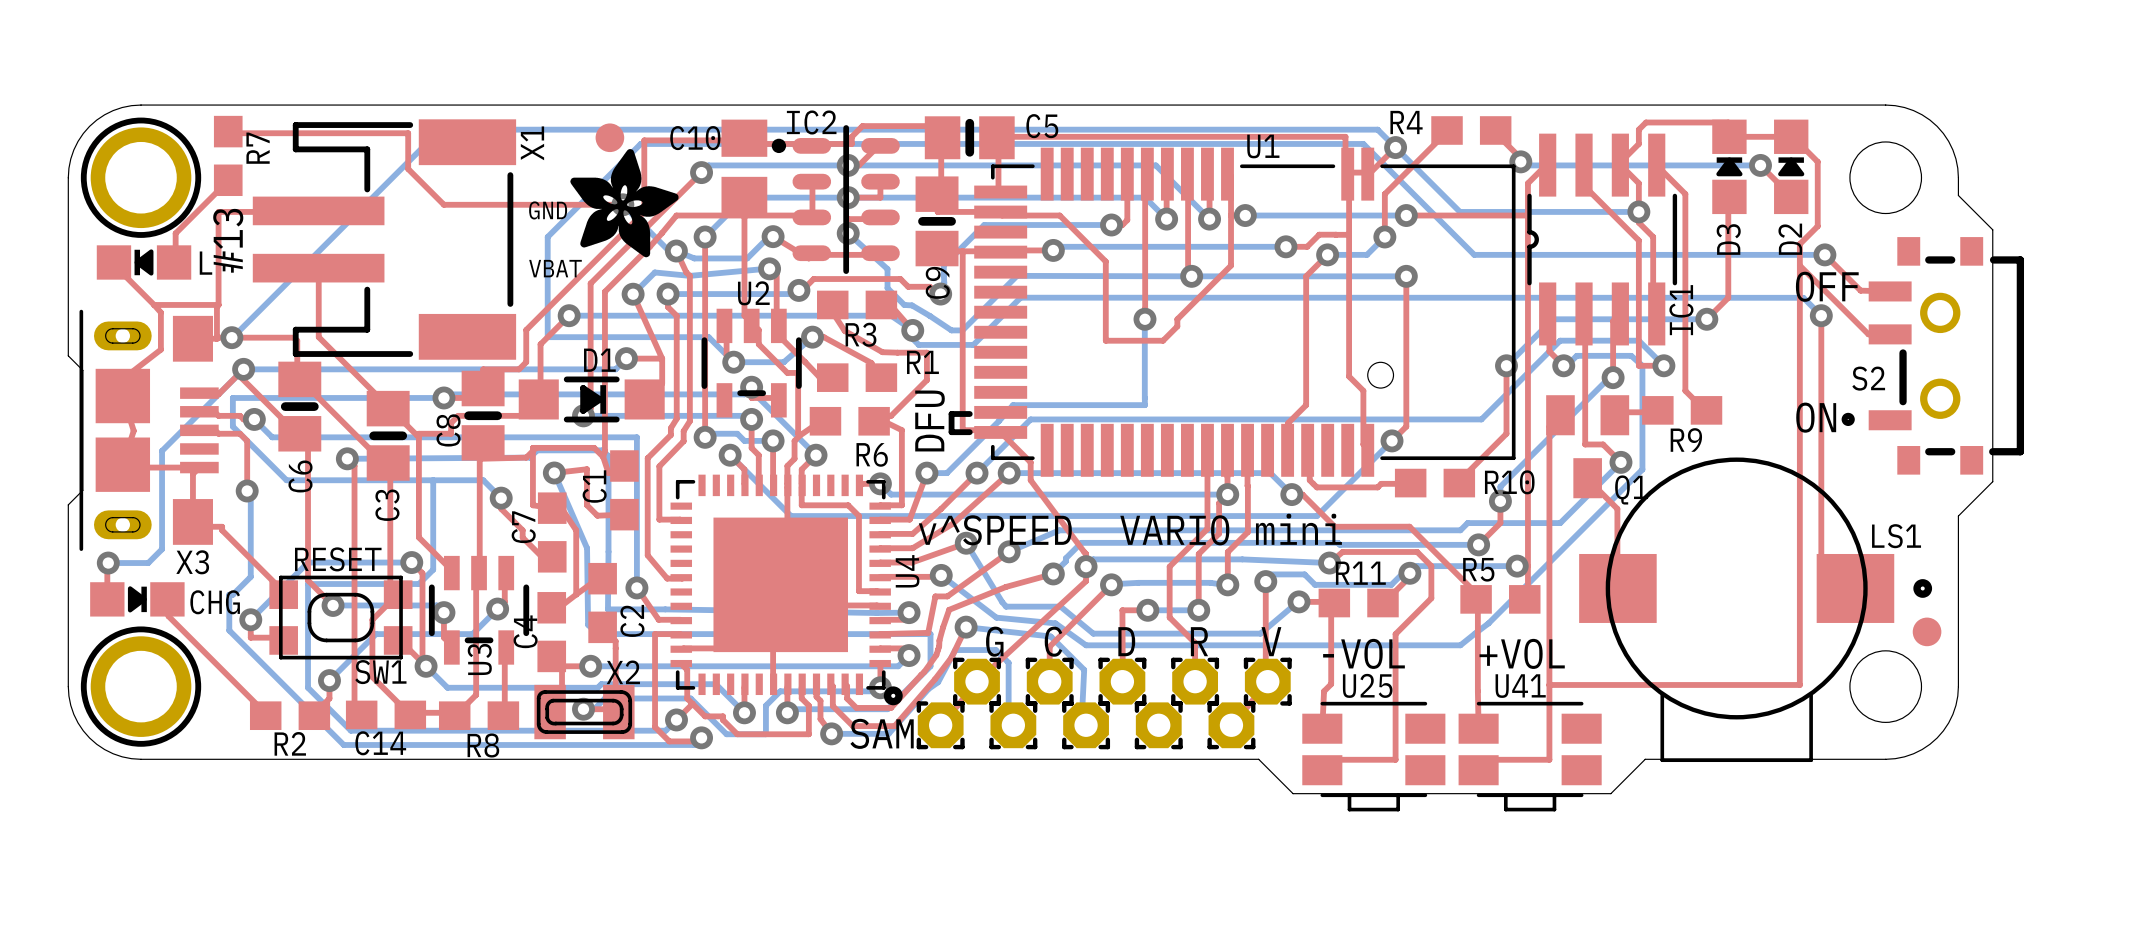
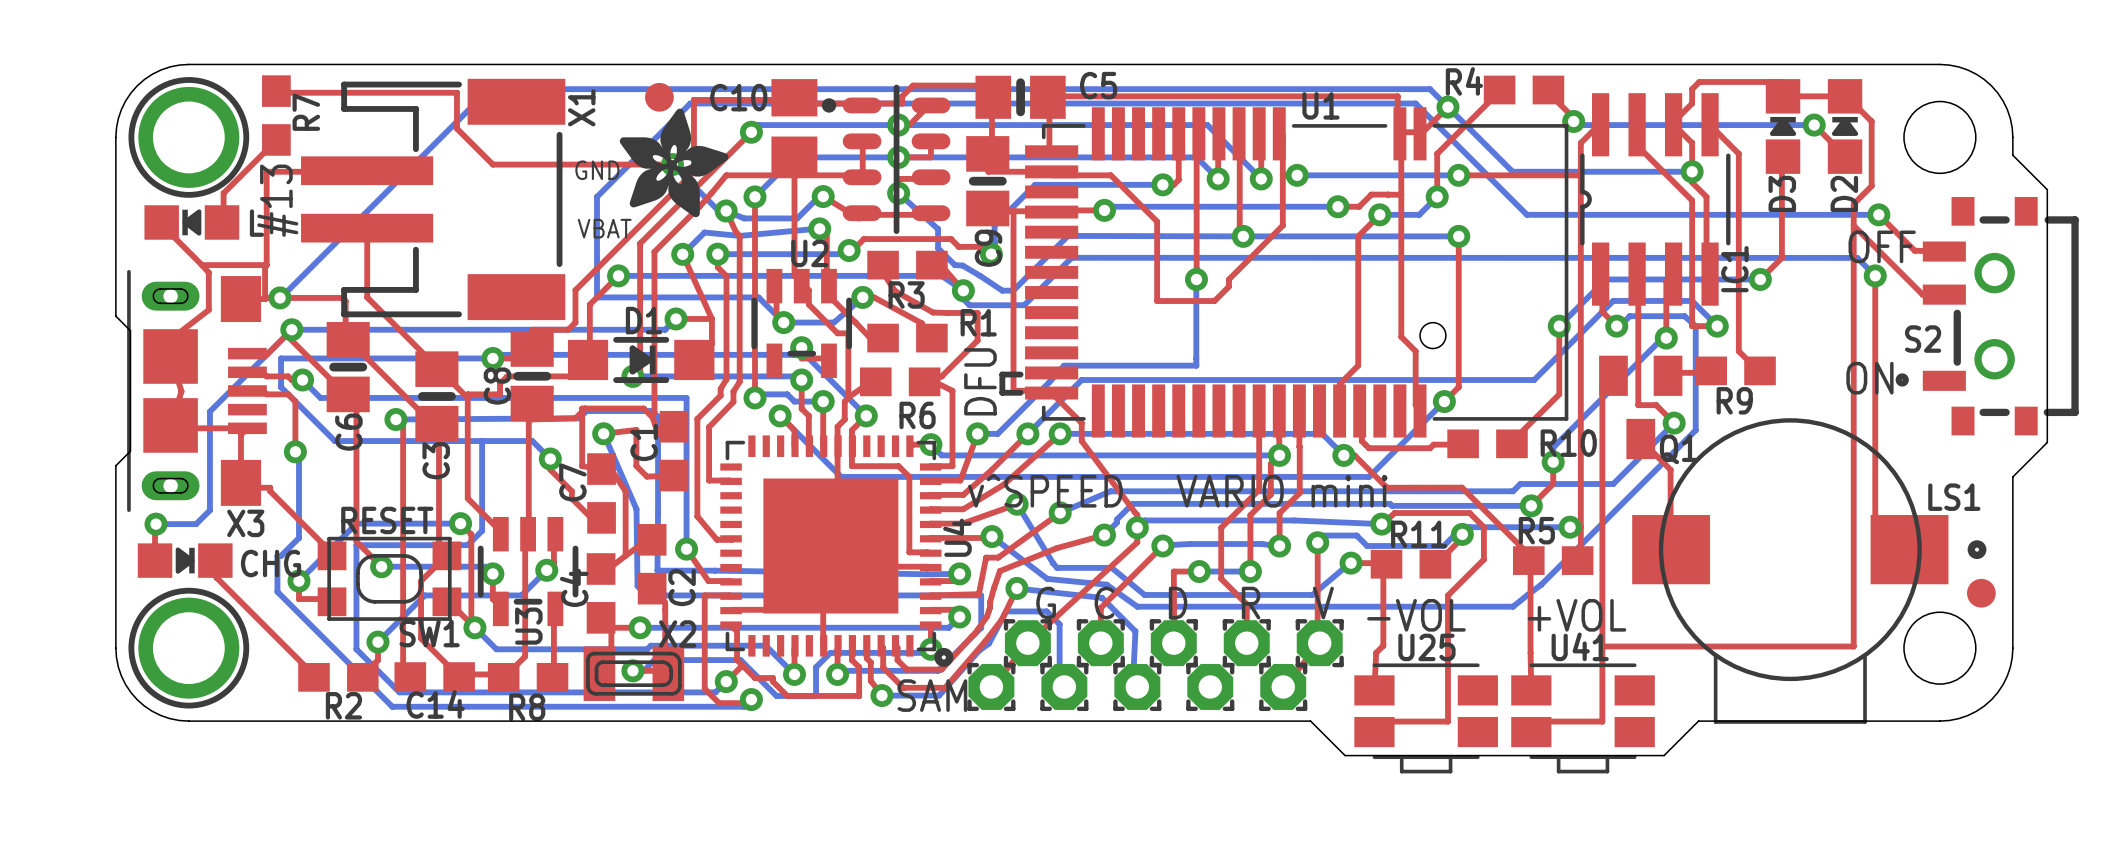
IC2 name: IC2 (811, 122) -> none

